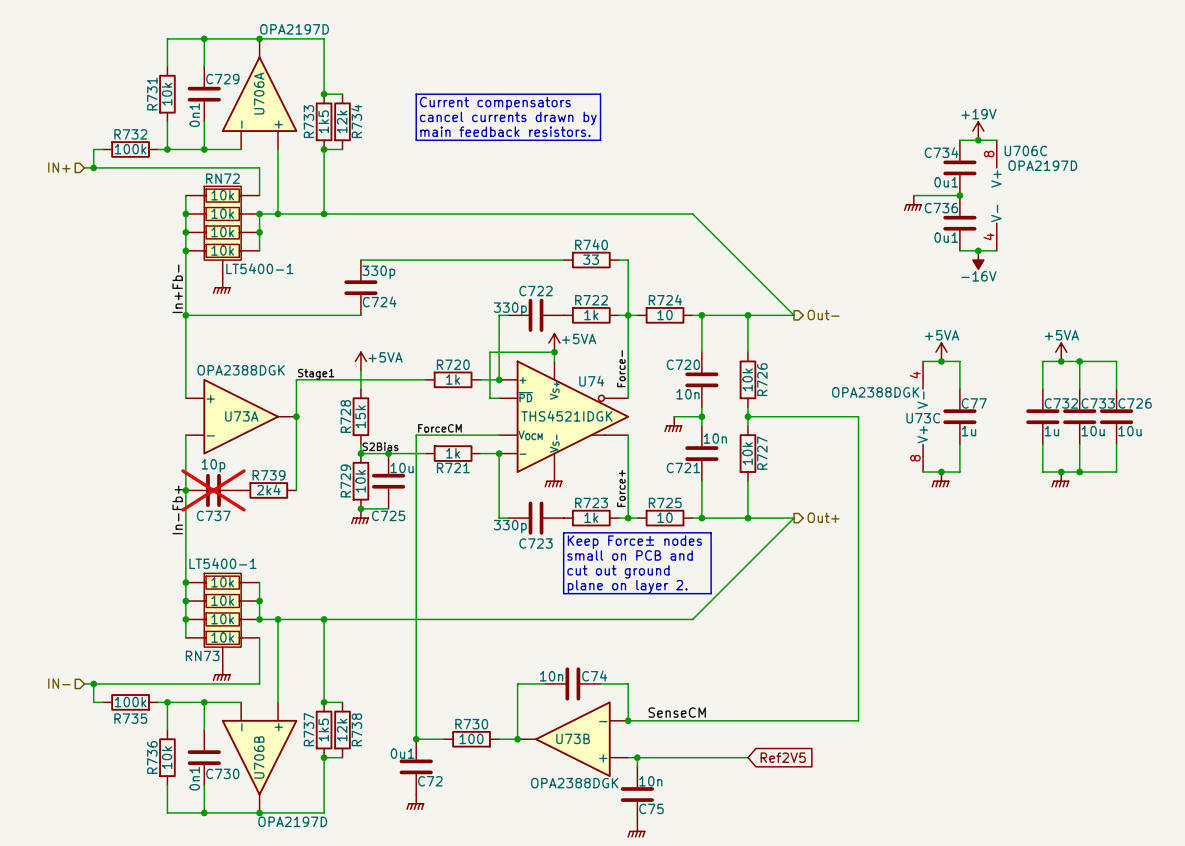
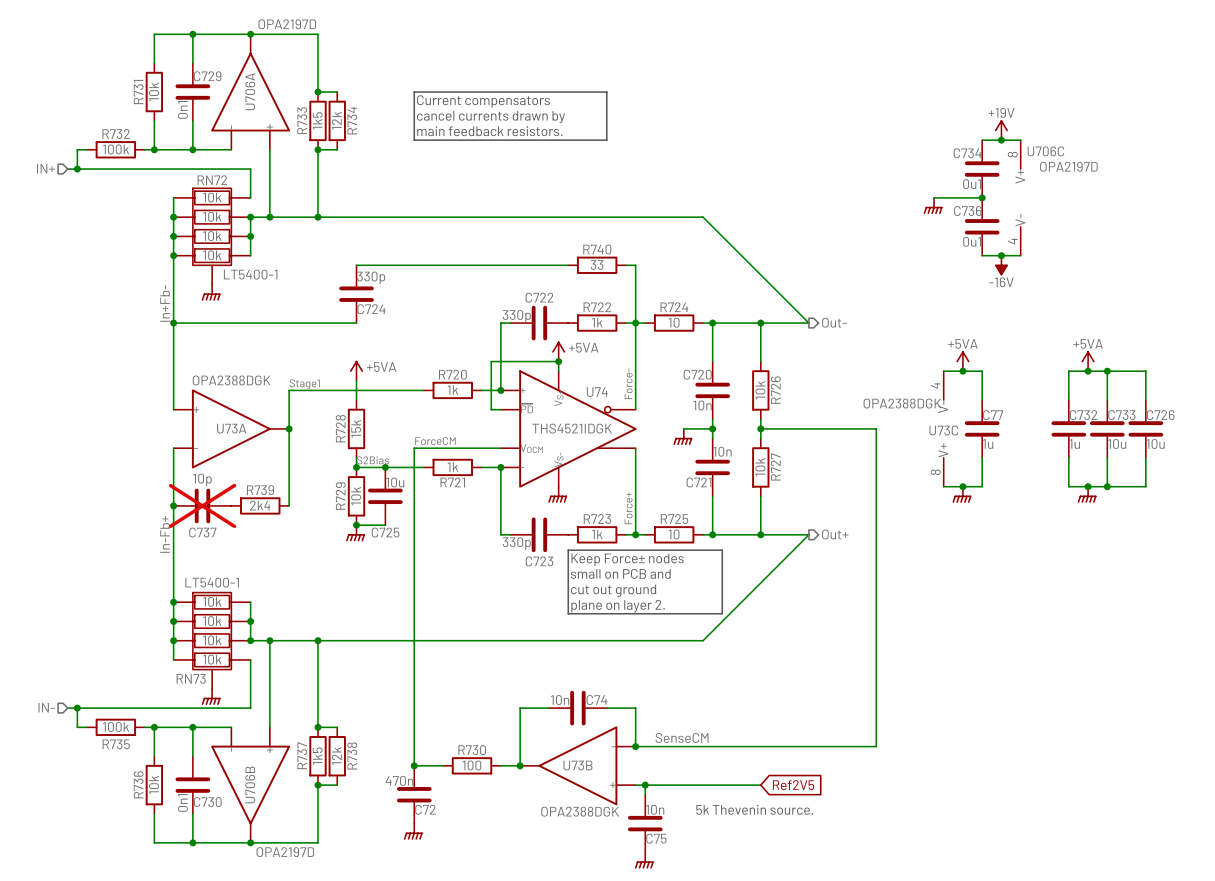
C72 value: 0u1 (402, 753) -> 470n (399, 780)
text: none -> 5k Thevenin source. (754, 809)

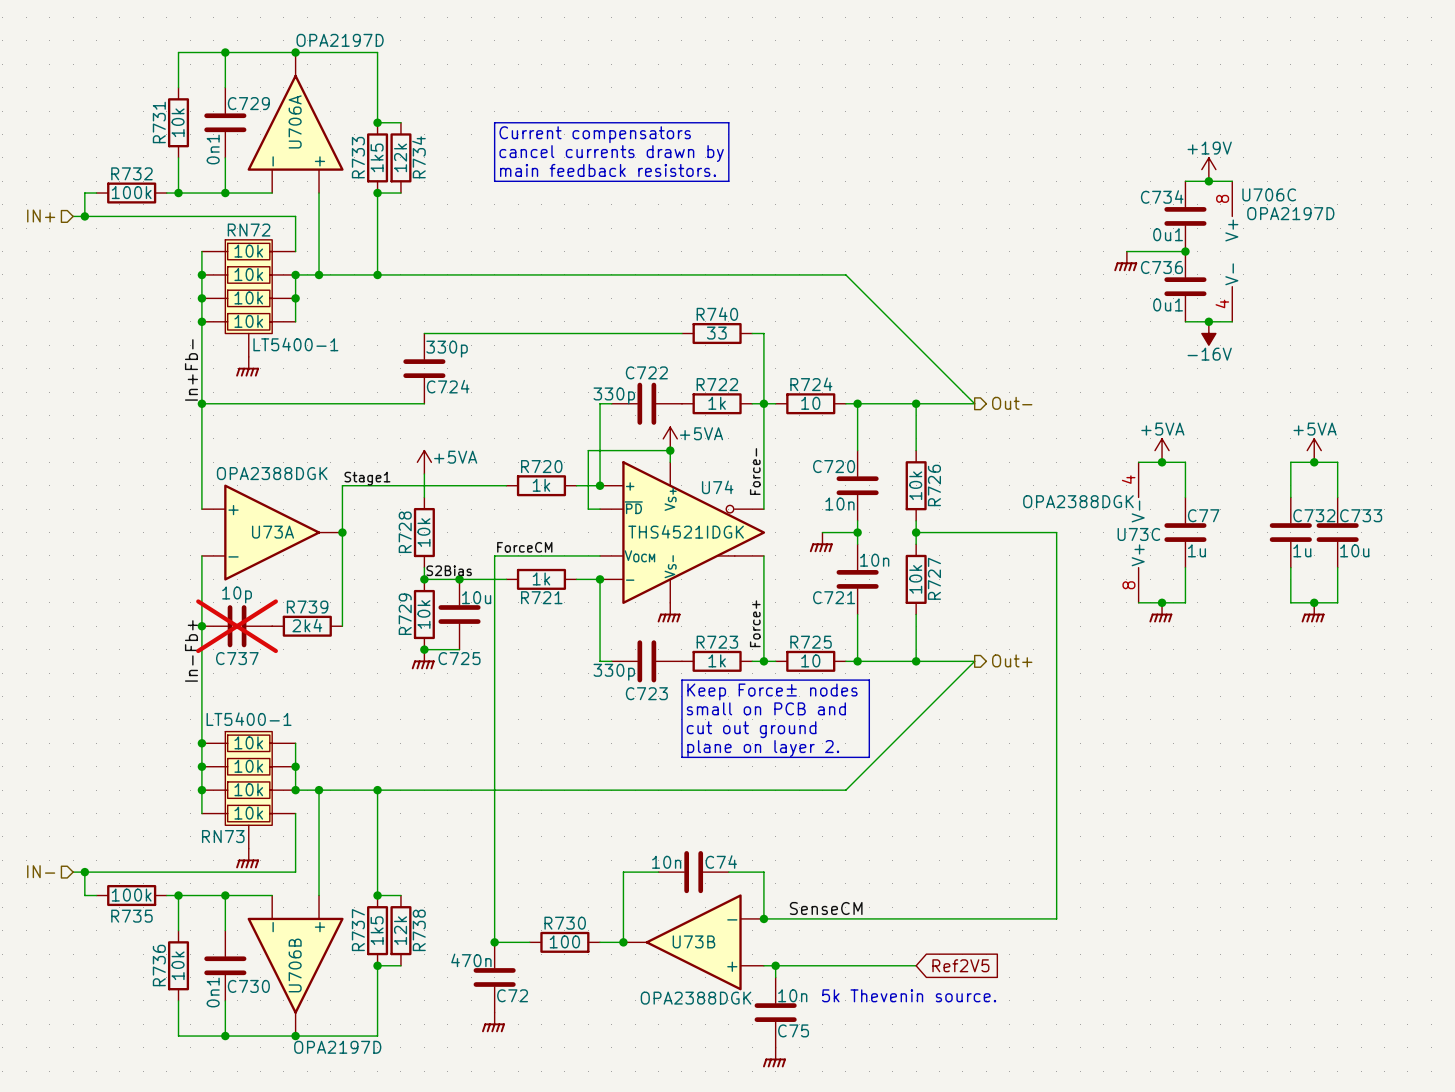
wire: (1107, 371) (1145, 371) (1145, 400) -> none
junction: (1107, 371) -> none
R728 value: 15k (356, 428) -> 10k (423, 532)
C726: 10u (1145, 428) -> none
wire: (1145, 457) (1145, 486) (1107, 486) -> none
junction: (1107, 486) -> none

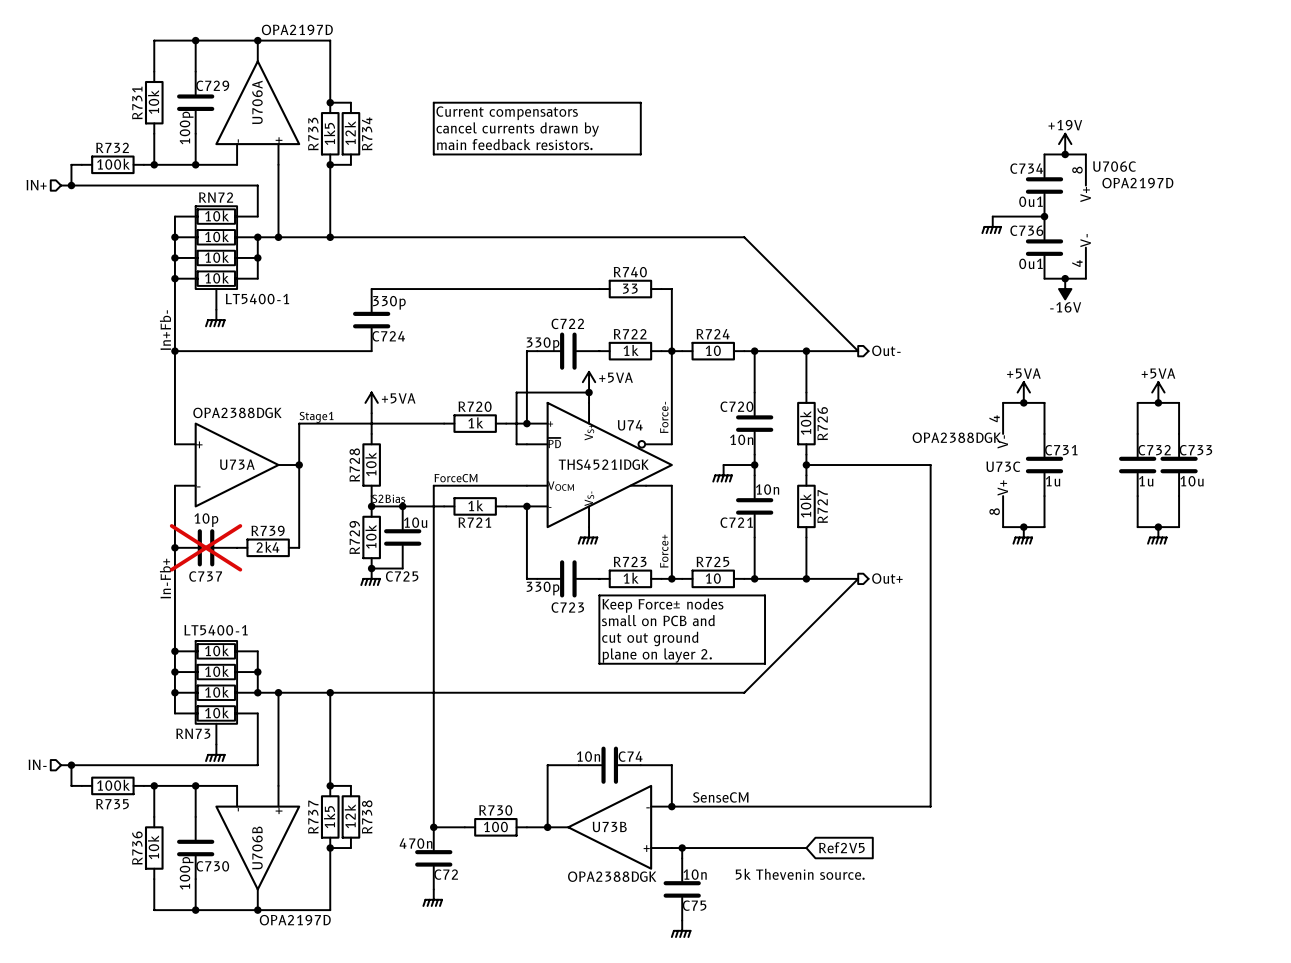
C729 value: 0n1 (213, 149) -> 100p (186, 128)
C77 name: C77 (1203, 515) -> C731 (1061, 450)
C730 value: 0n1 (213, 992) -> 100p (186, 873)

